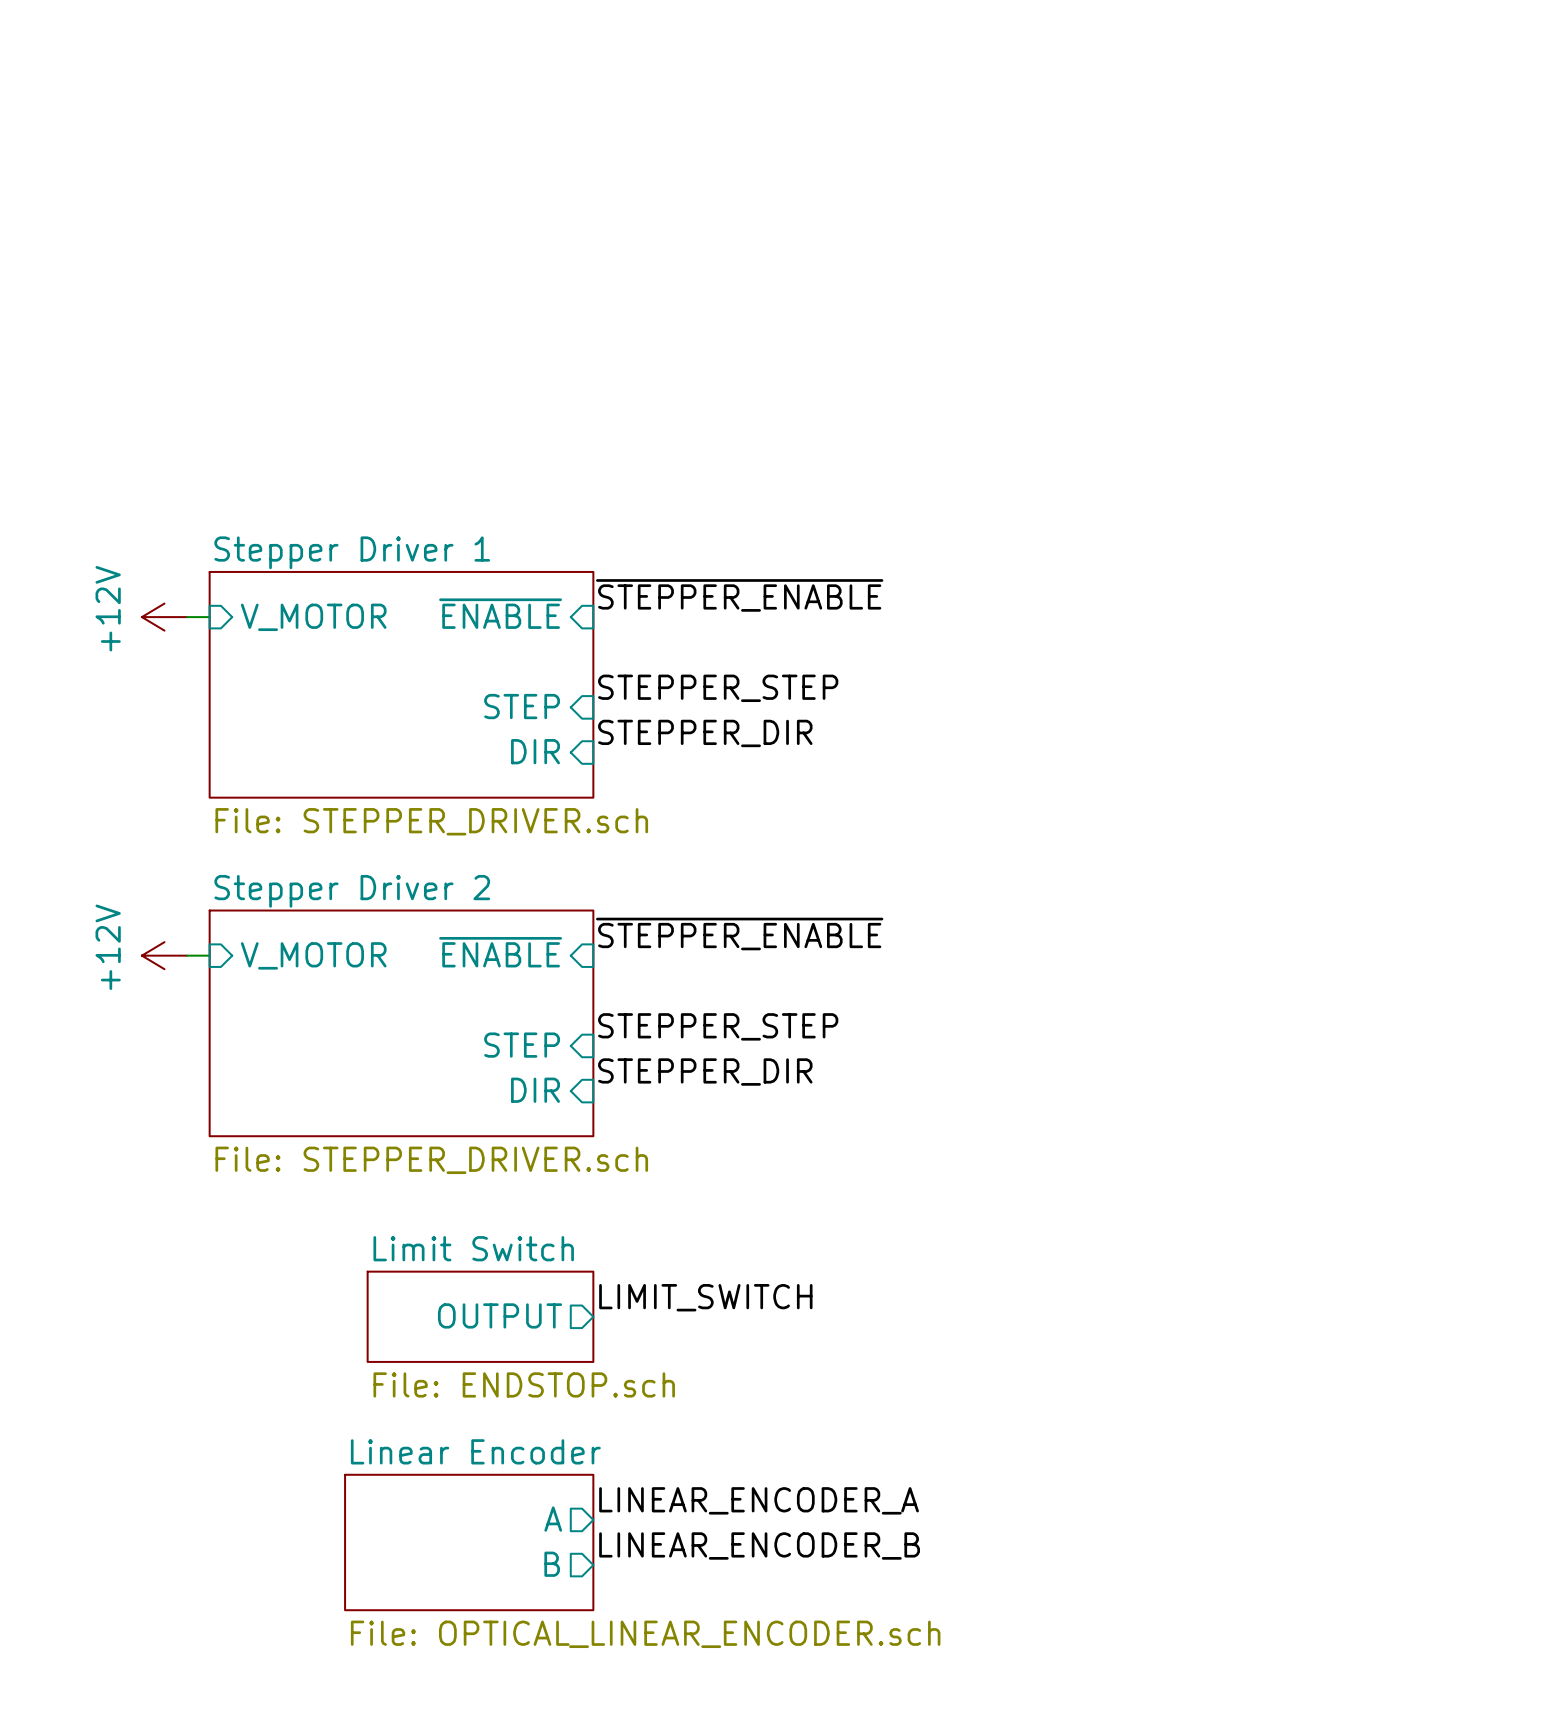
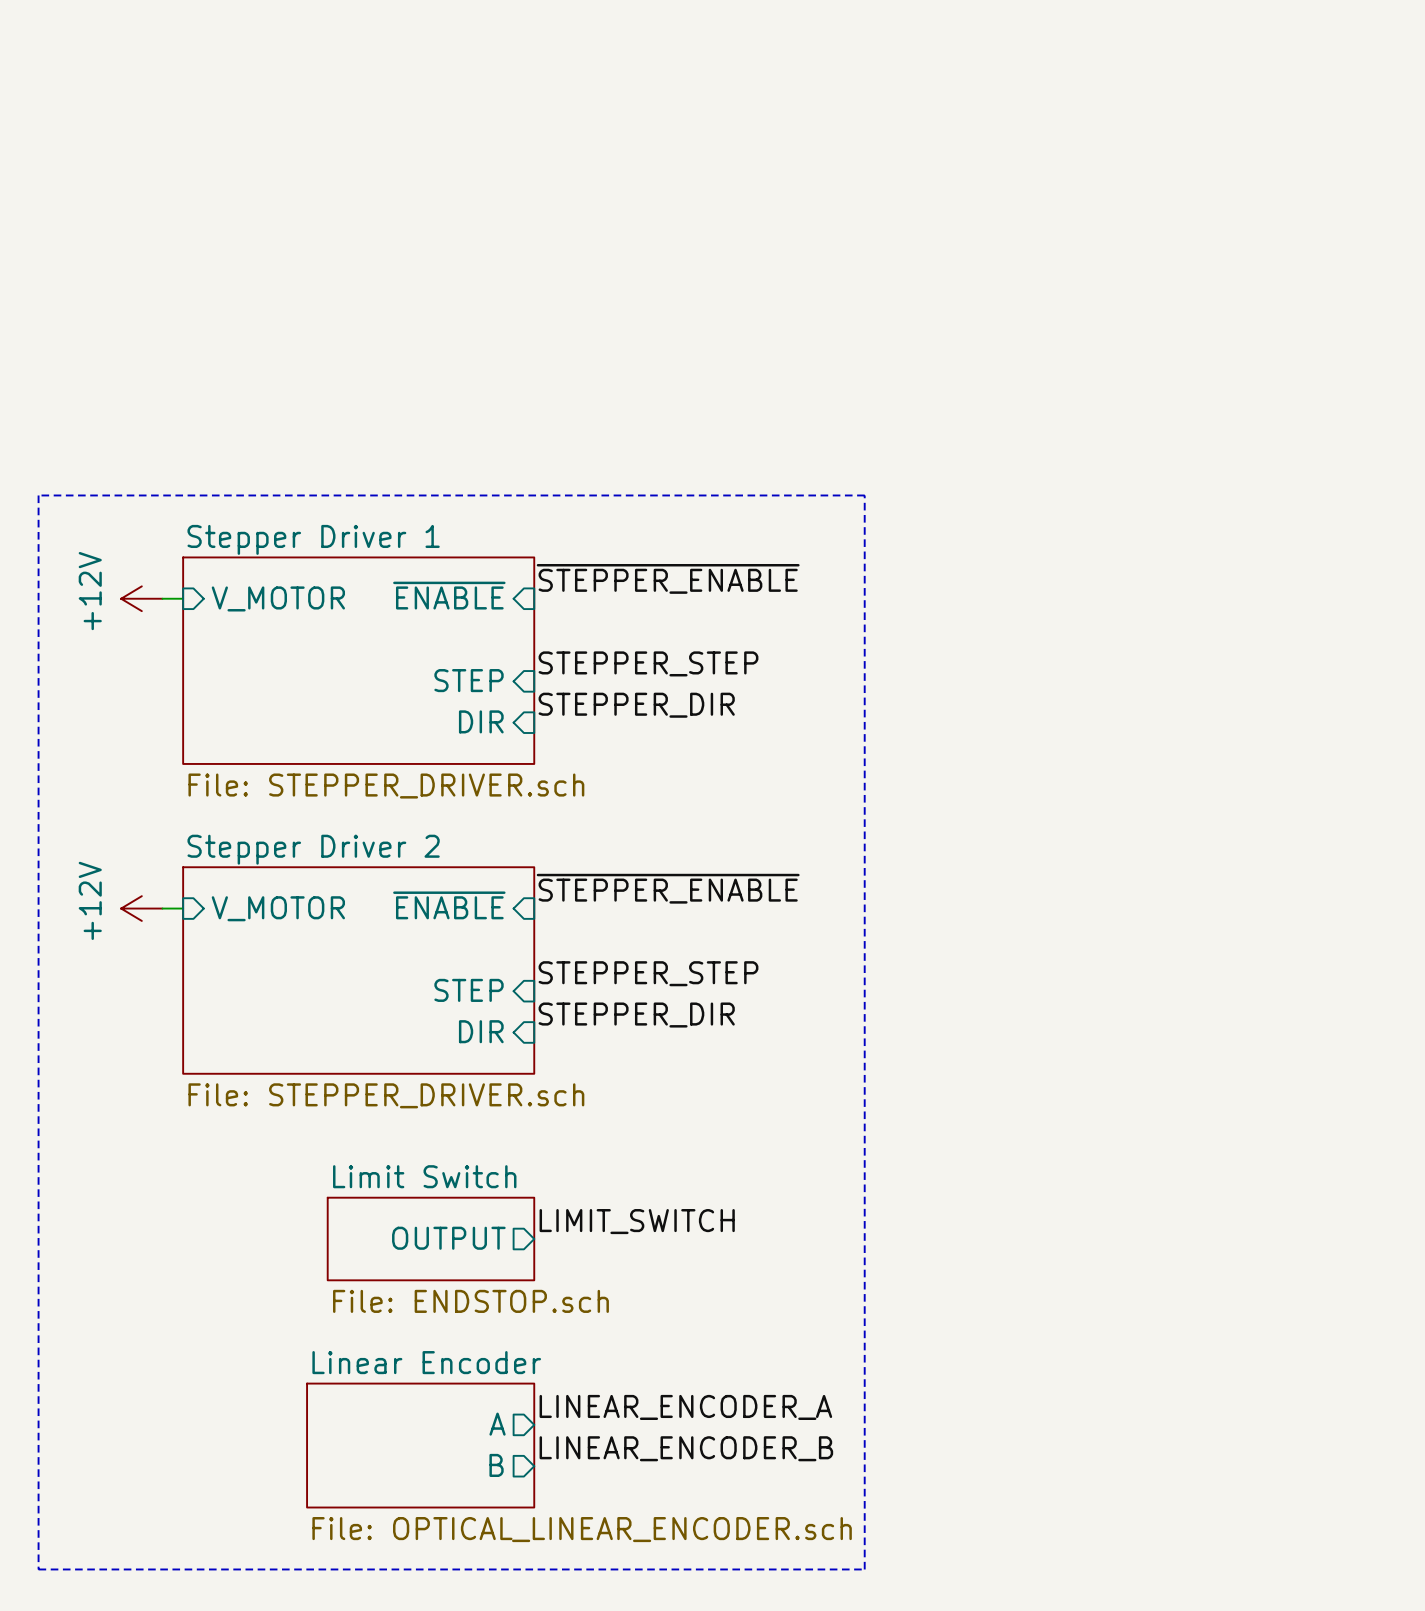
line: none -> (38, 495) (38, 1569) (864, 1569) (864, 495) (38, 495)

